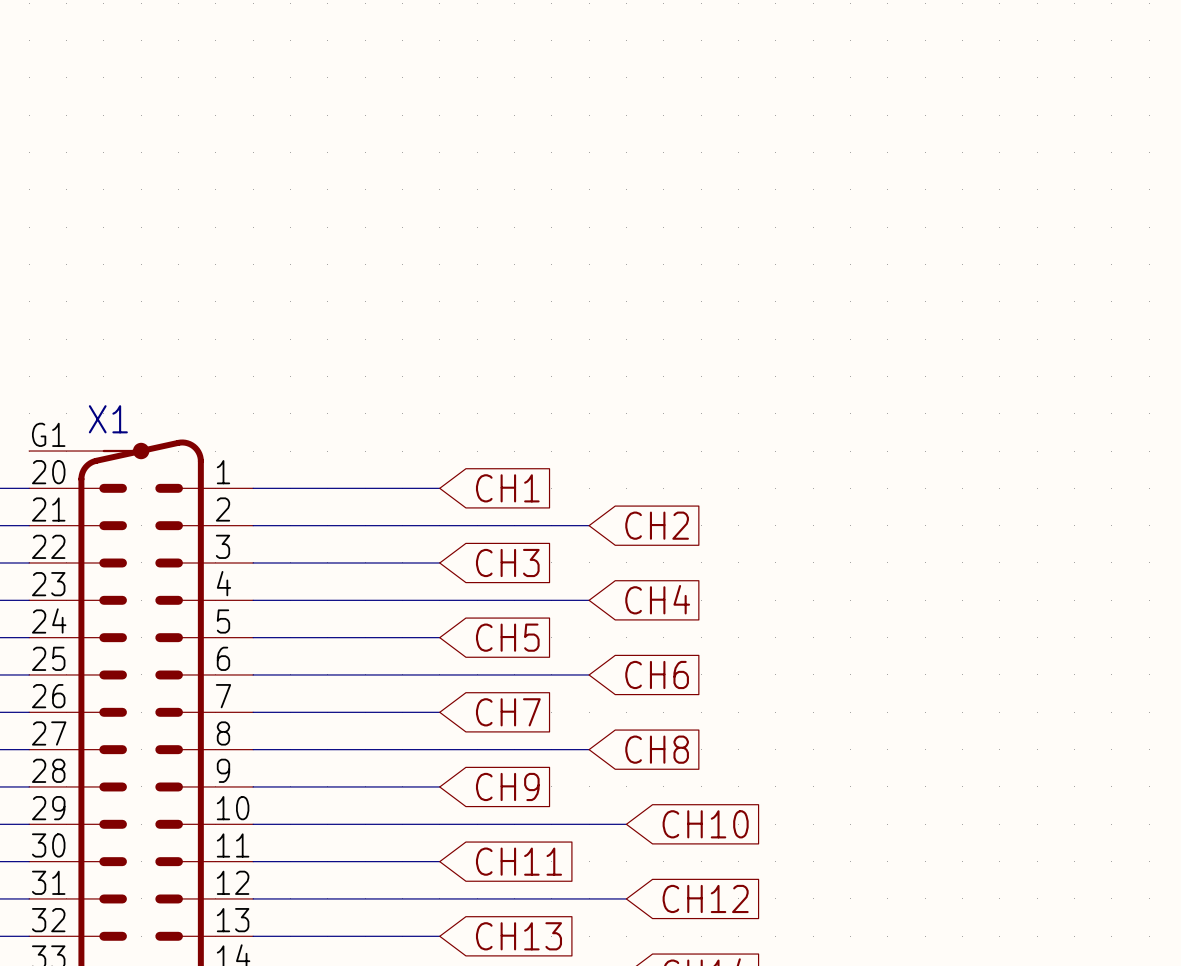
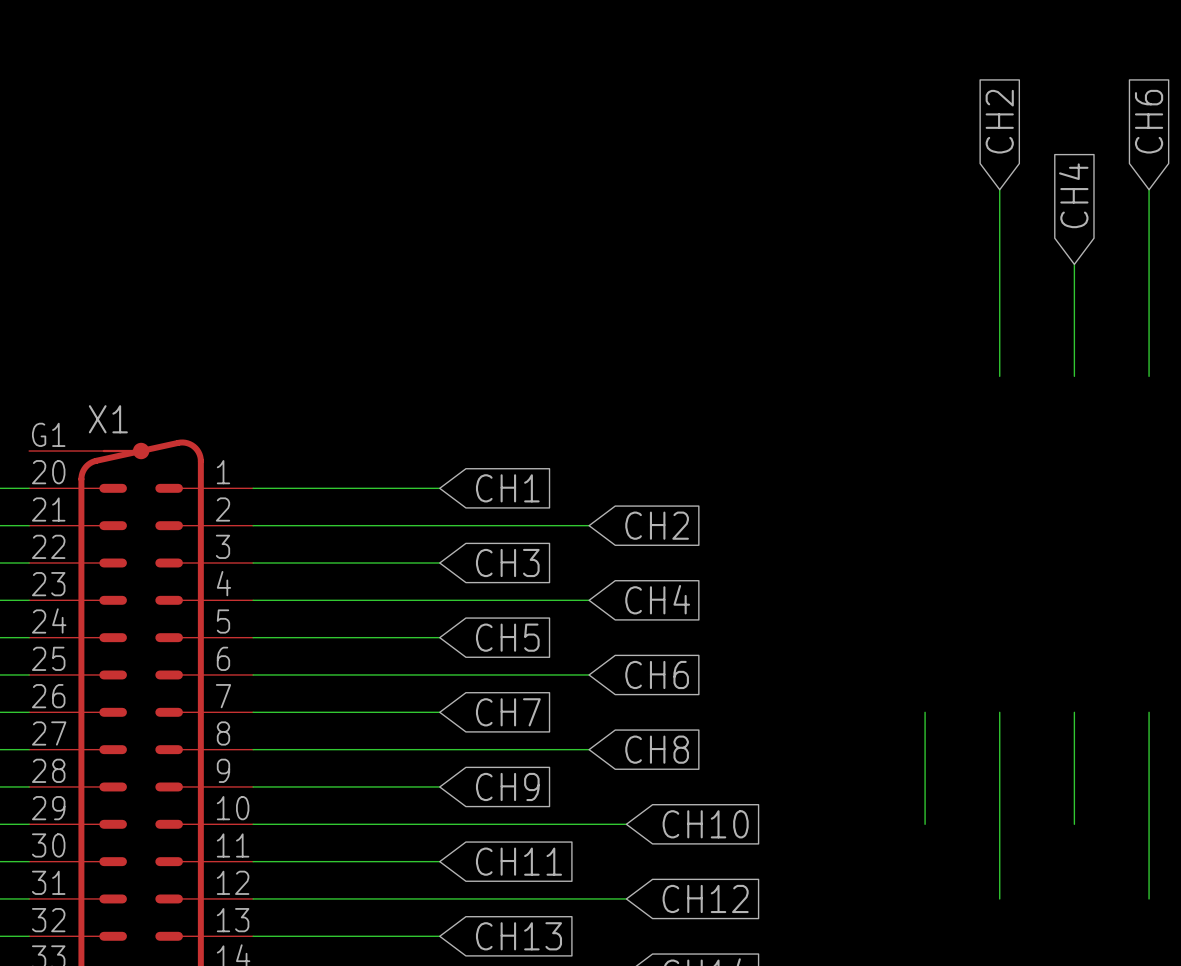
global label: none -> CH2 (999, 121)
global label: none -> CH6 (1149, 121)
wire: none -> (999, 189) (999, 376)
wire: none -> (1149, 189) (1149, 376)
global label: none -> CH4 (1073, 195)
wire: none -> (1074, 264) (1074, 376)
wire: none -> (925, 712) (925, 824)
wire: none -> (999, 712) (999, 898)
wire: none -> (1074, 712) (1074, 824)
wire: none -> (1149, 712) (1149, 898)

